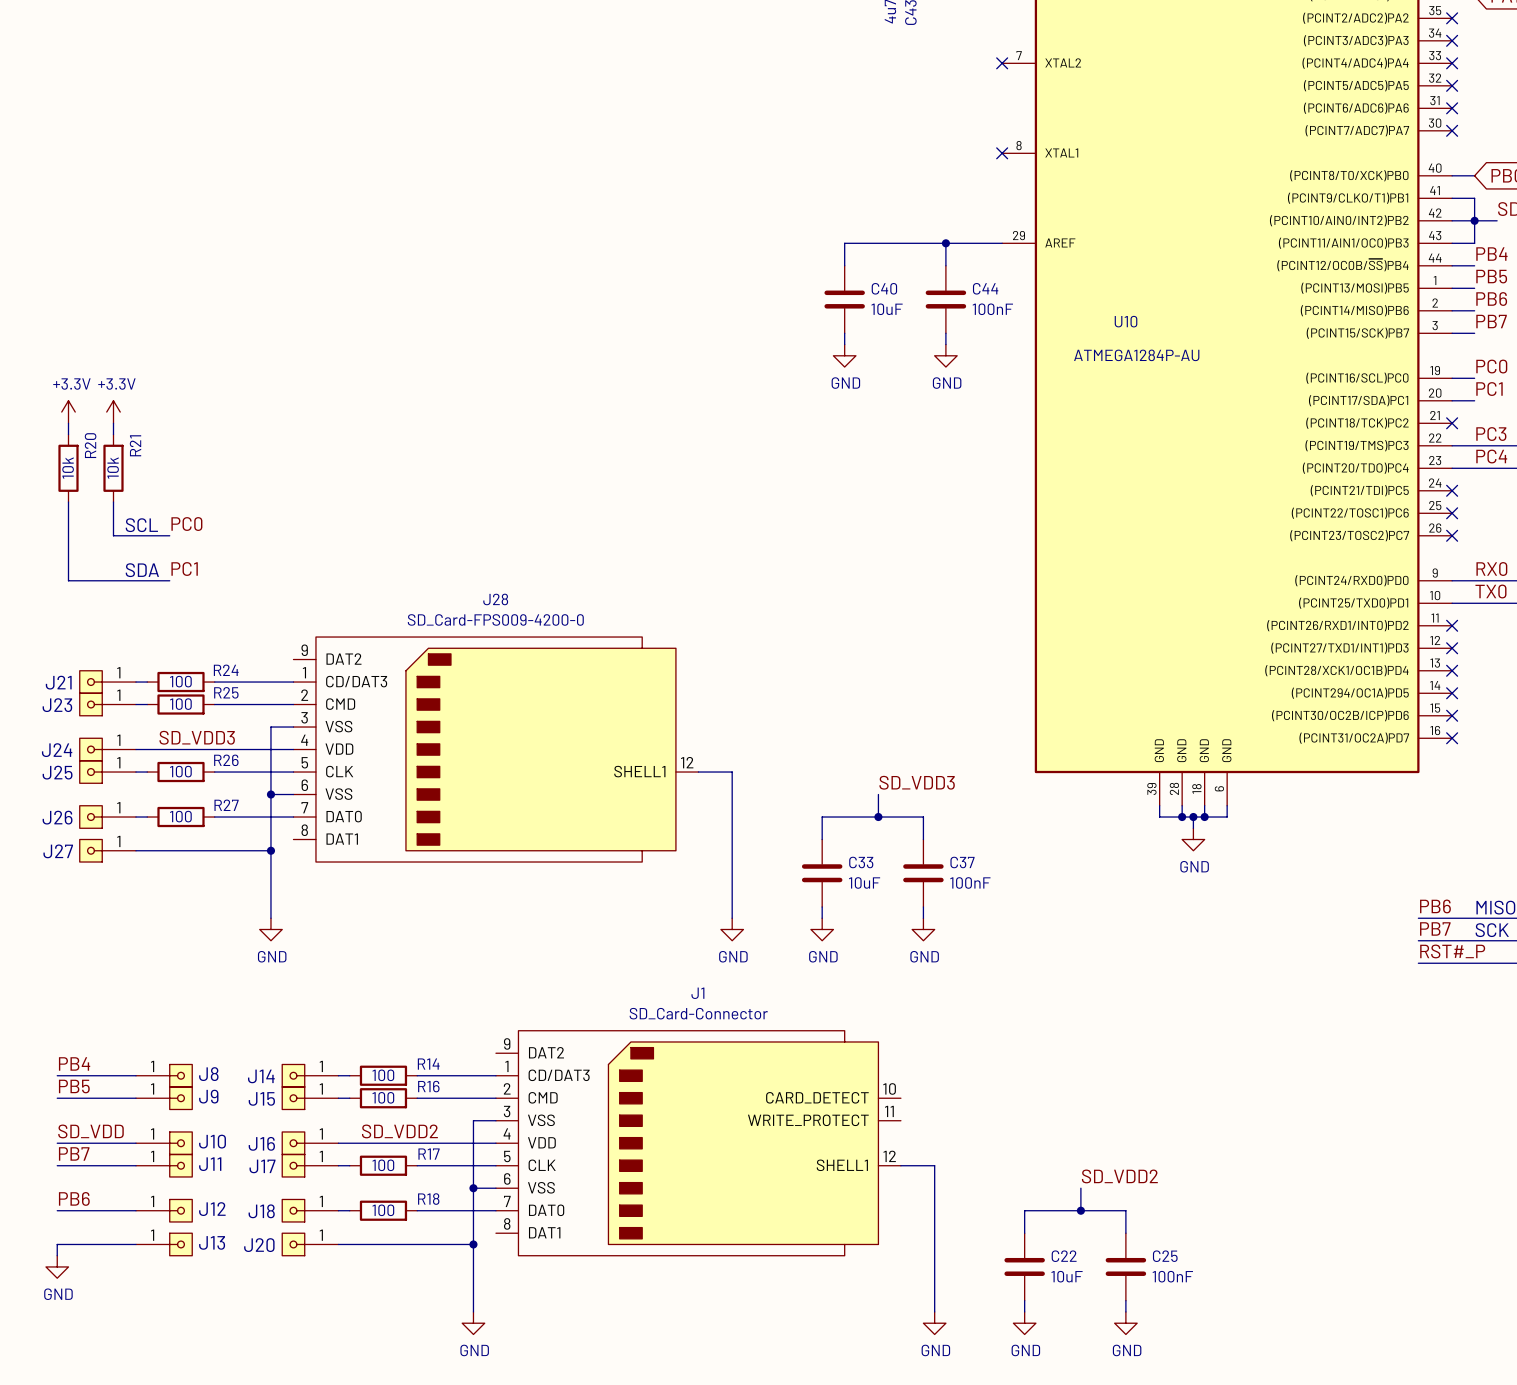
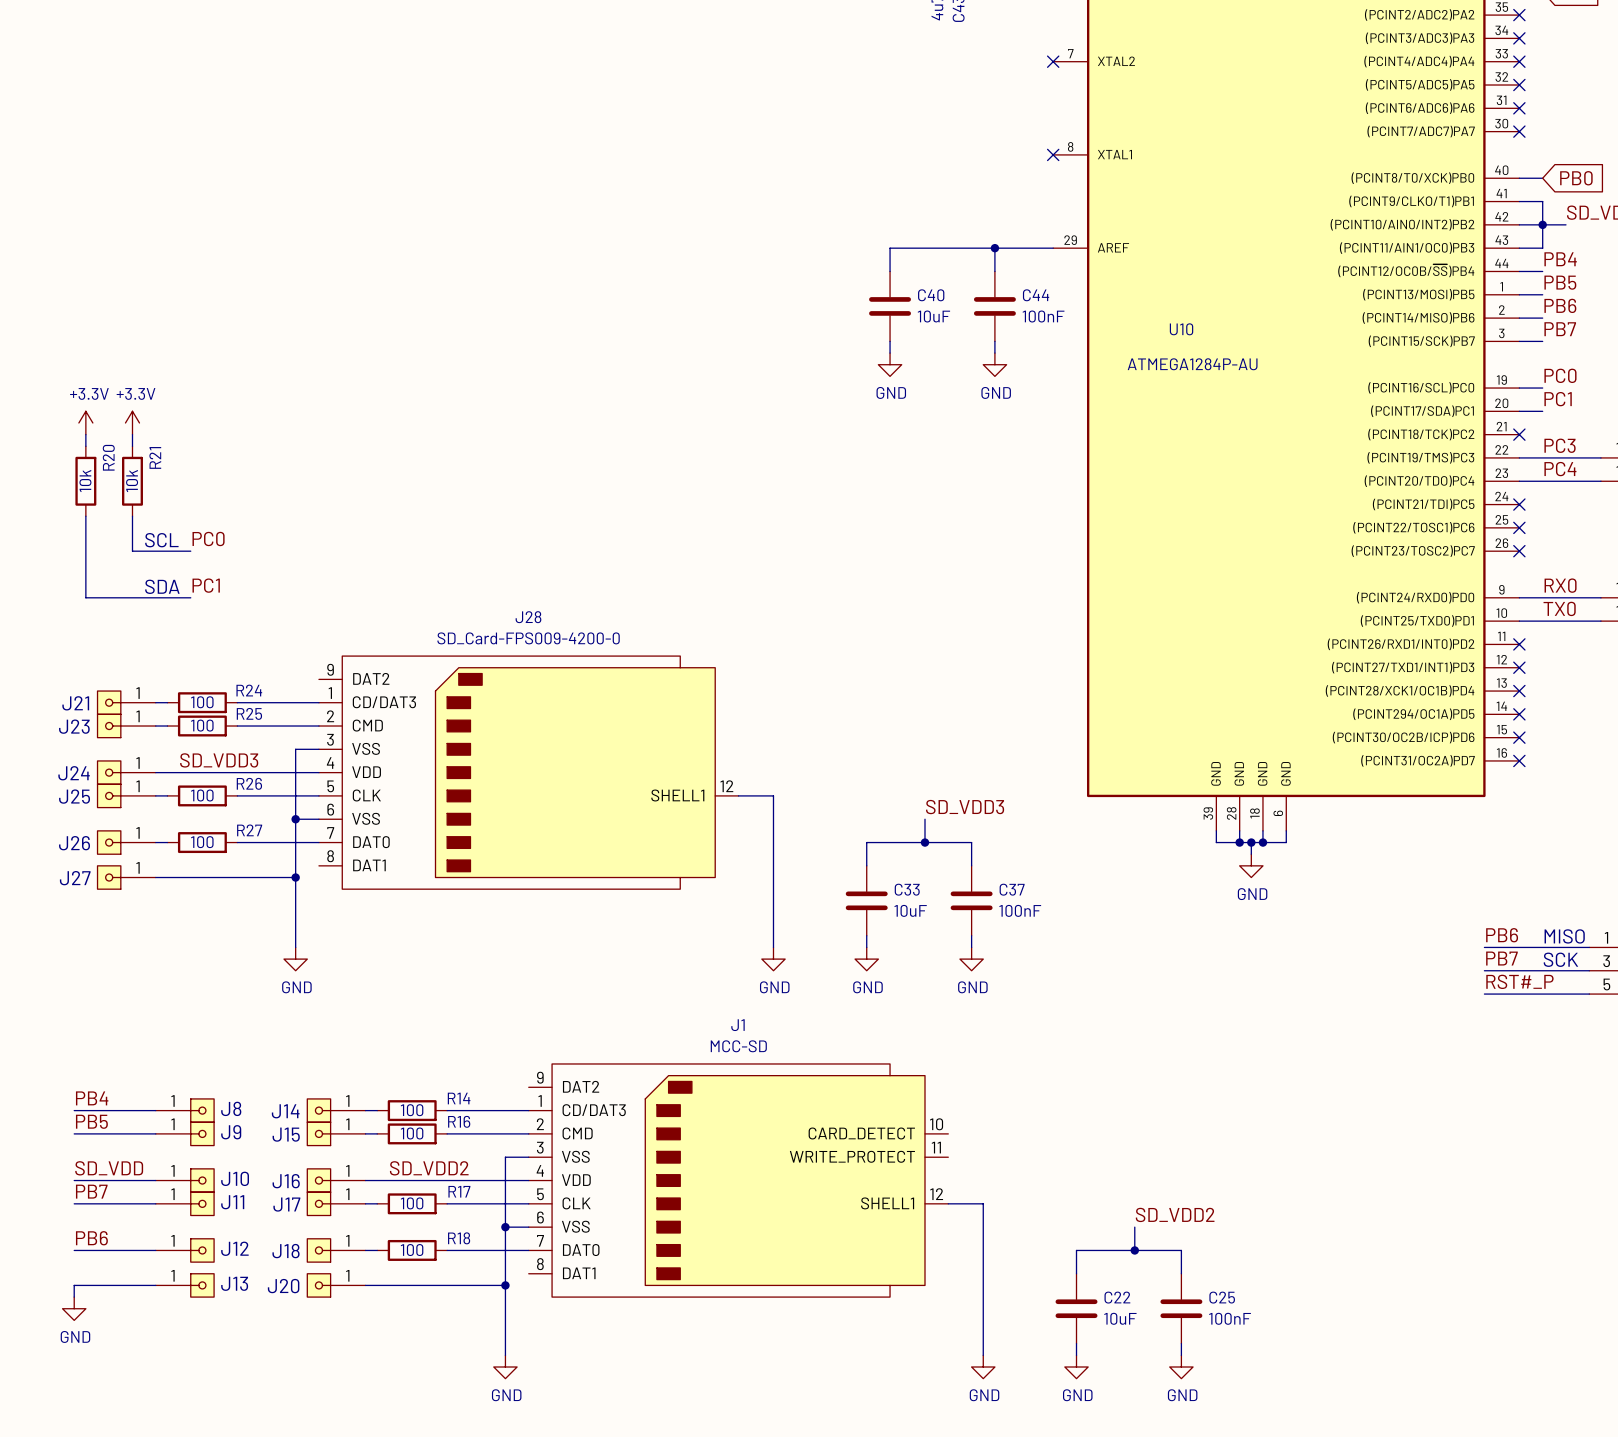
J1 value: SD_Card-Connector (698, 1013) -> MCC-SD (738, 1046)

